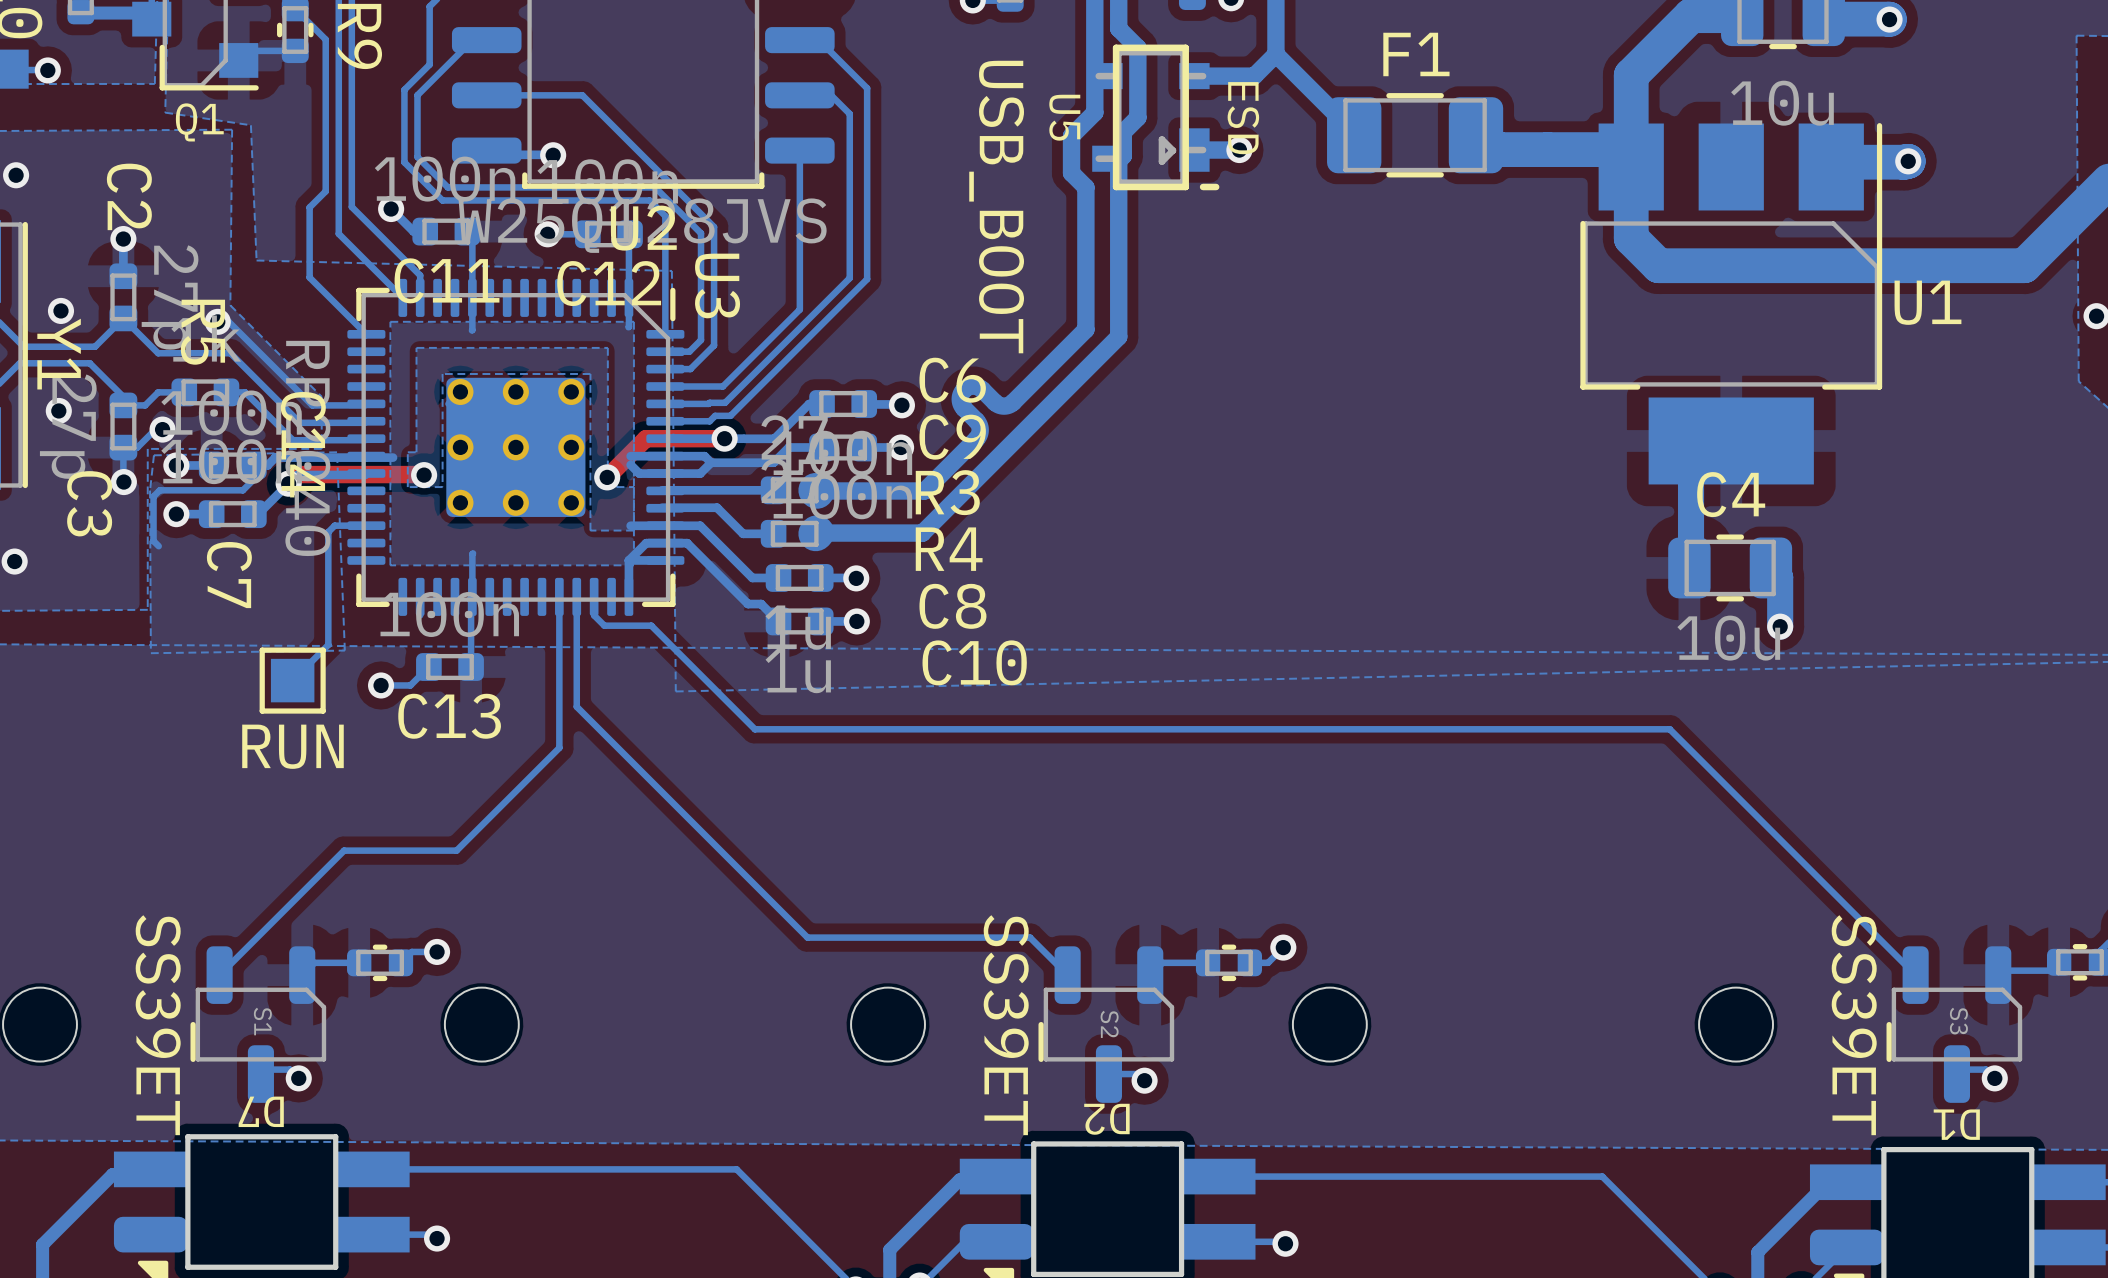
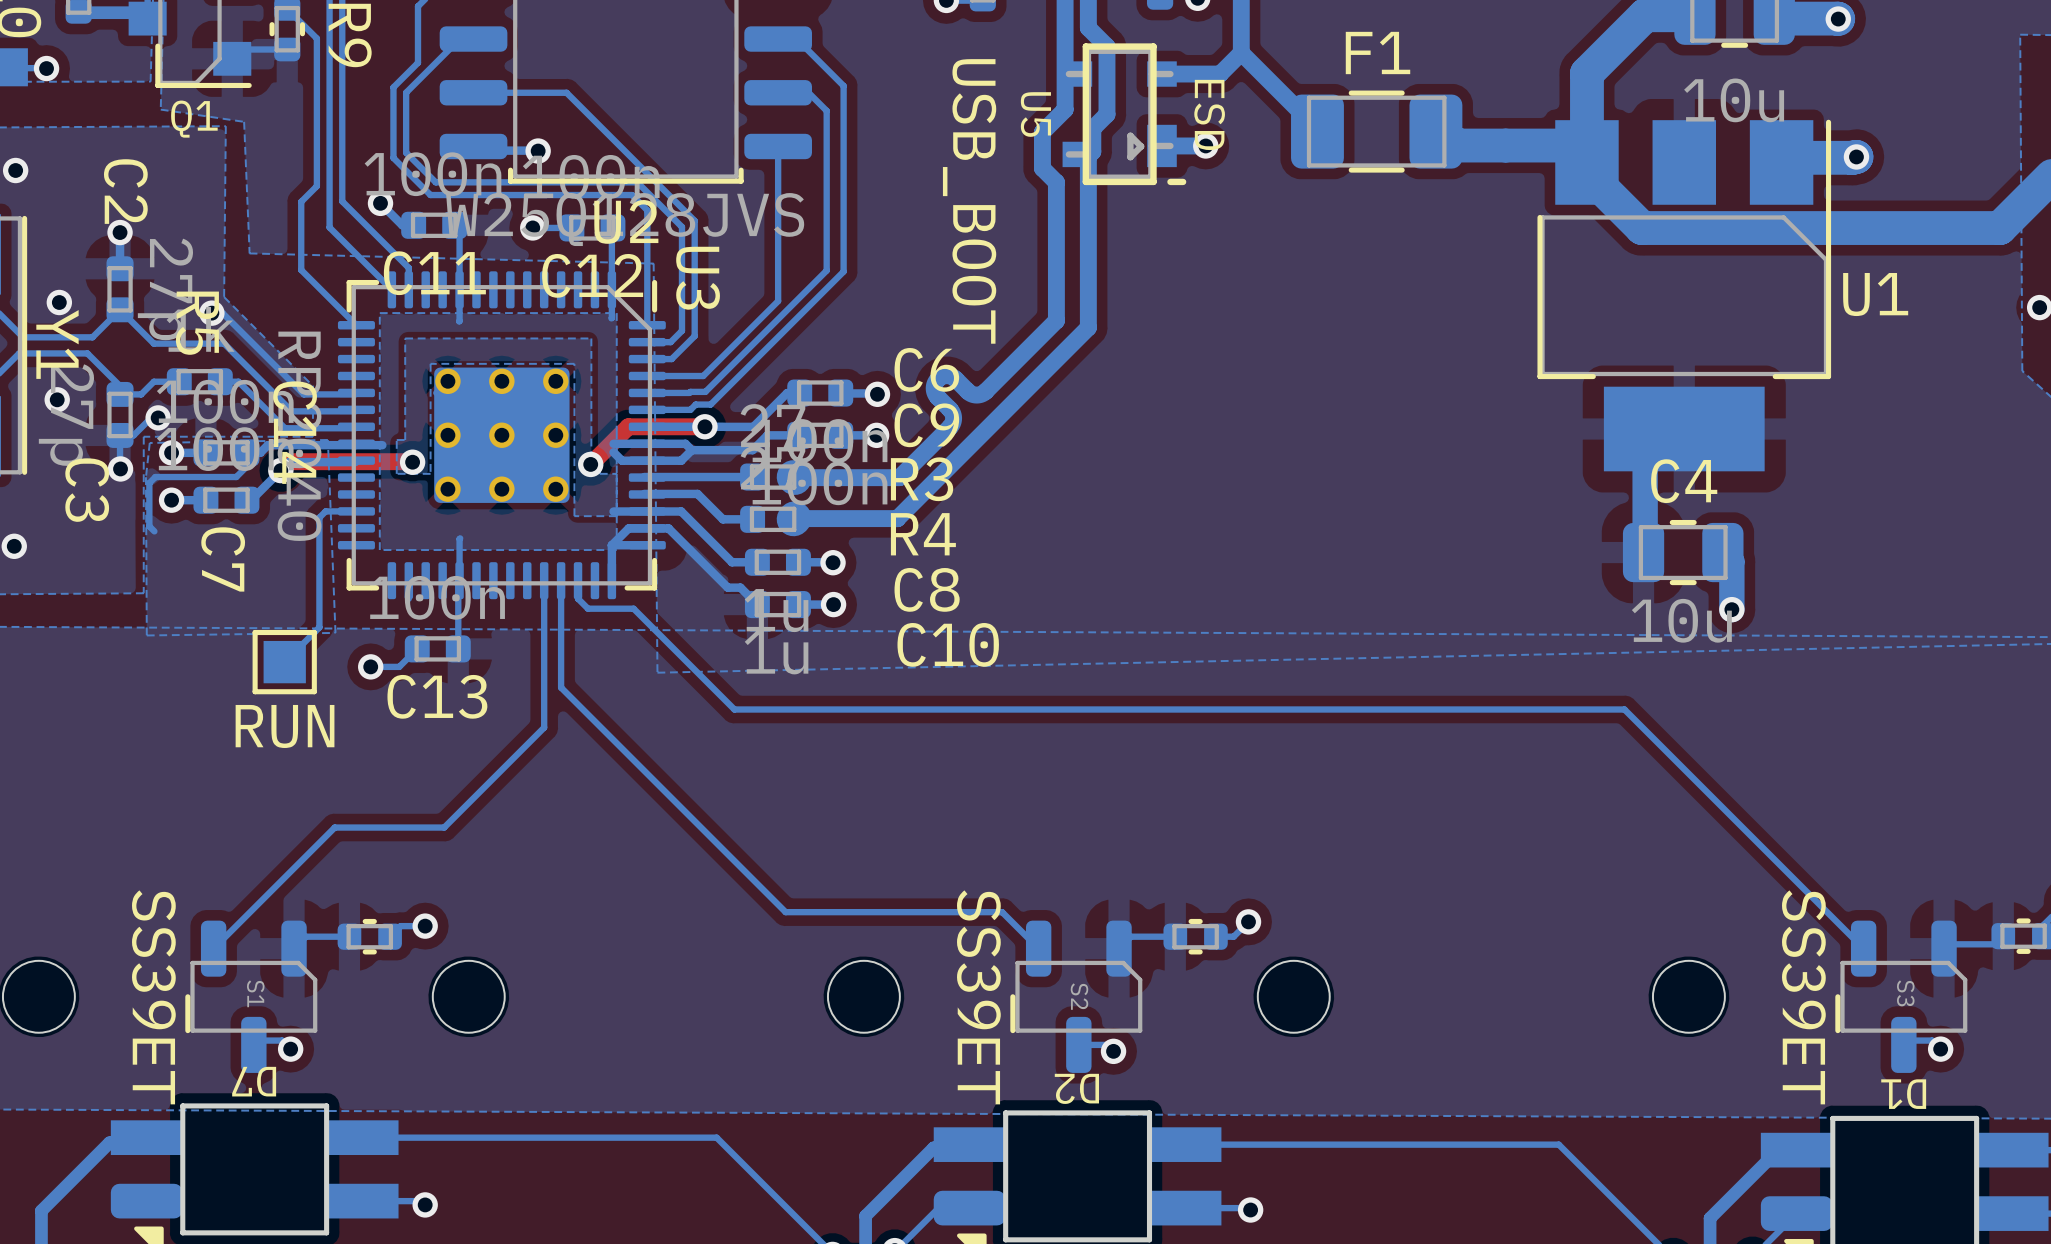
bottom track: (1631, 177) (1631, 238) (1658, 265) (2024, 265) (2055, 234) -> (1586, 173) (1641, 228) (1999, 228)

